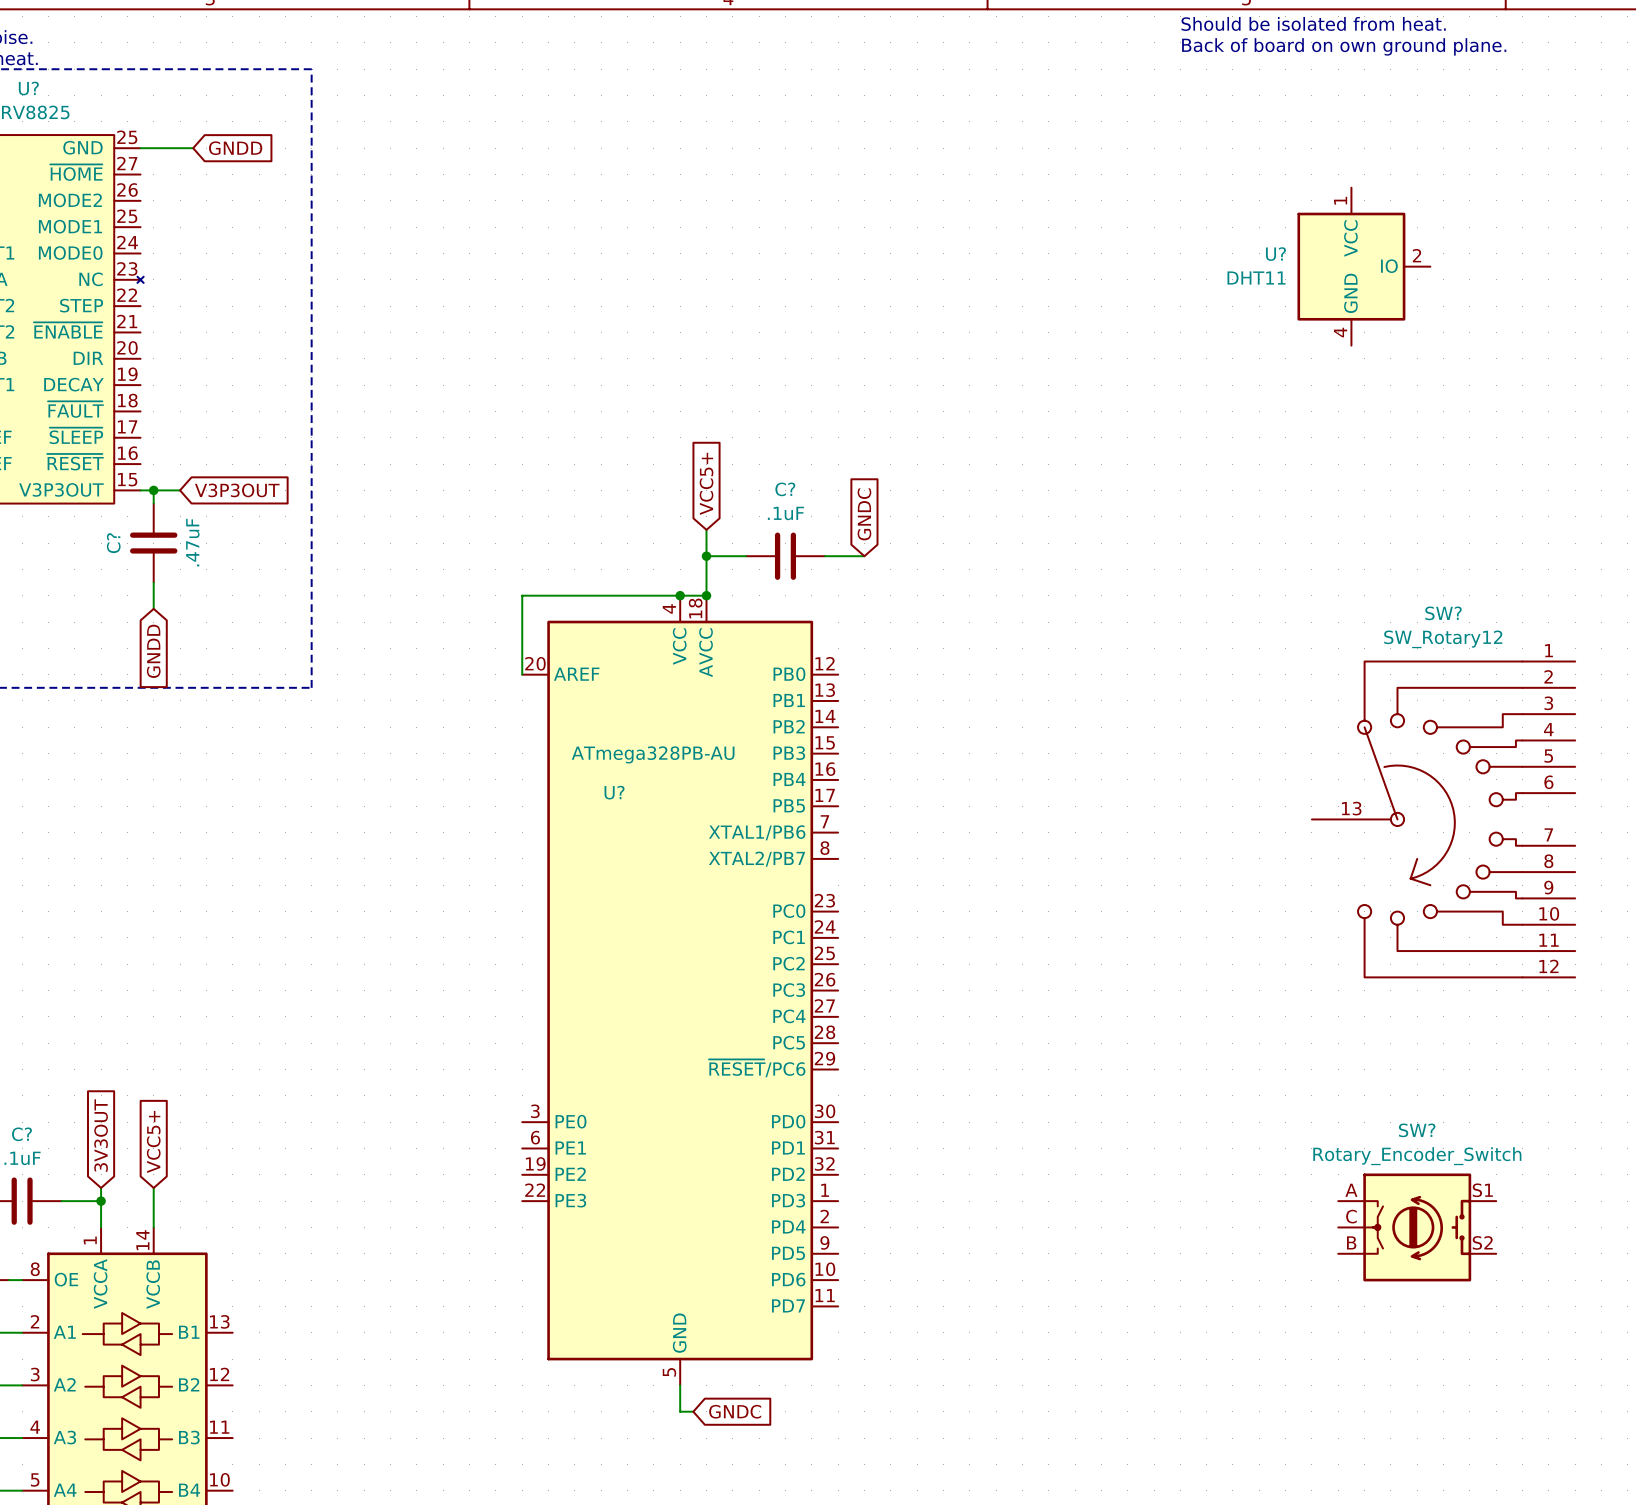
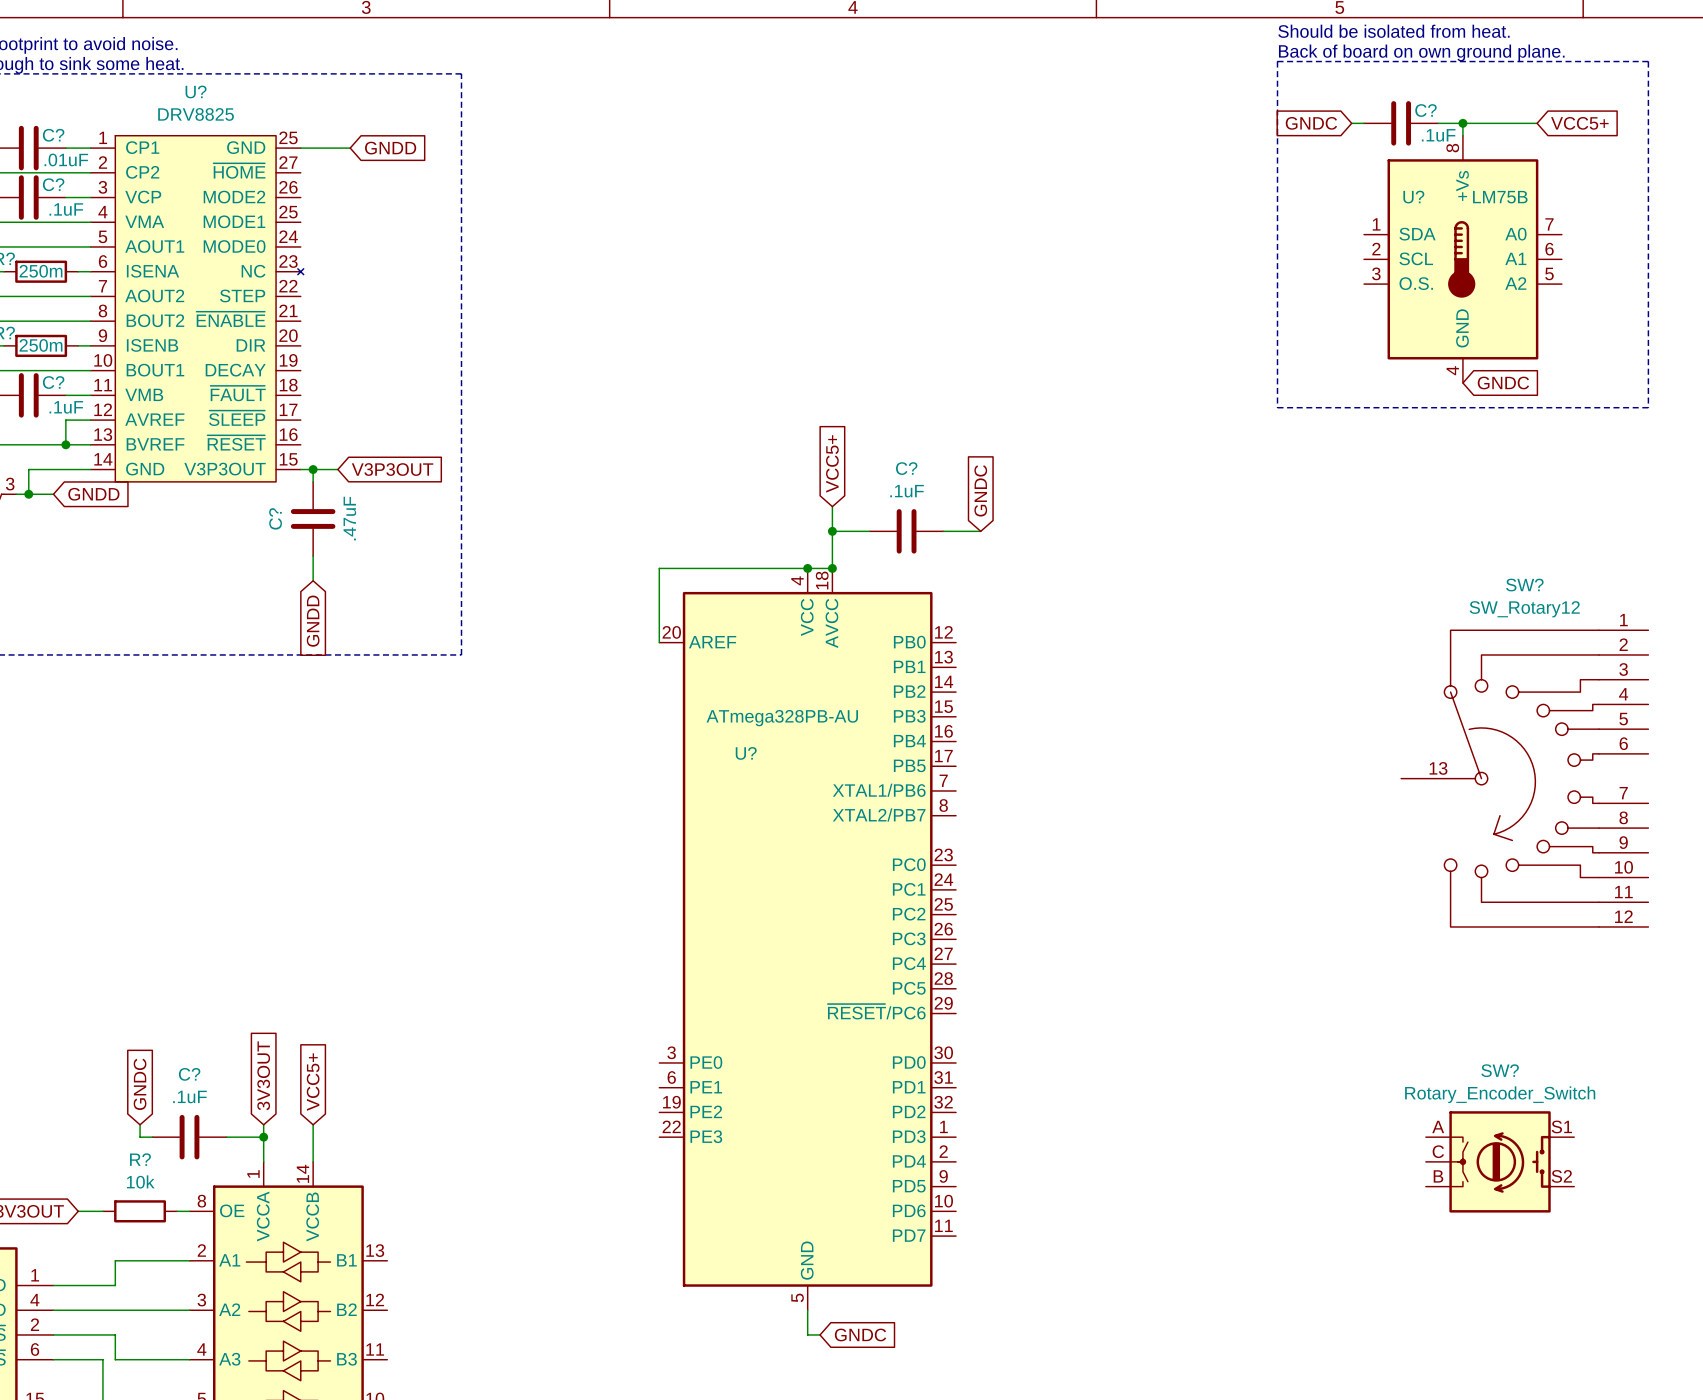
line: none -> (1277, 61) (1648, 61) (1648, 407) (1277, 407) (1277, 61)
global label: none -> GNDC (1311, 123)
wire: none -> (1351, 123) (1364, 123)
C?: none -> .1uF (1401, 123)
wire: none -> (1438, 123) (1537, 123)
wire: none -> (1462, 123) (1462, 135)
junction: none -> (1462, 123)
global label: none -> VCC5+ (1579, 123)
U?: DHT11 (1363, 266) -> none
U?: none -> LM75B (1462, 259)
global label: none -> GNDC (1503, 382)

